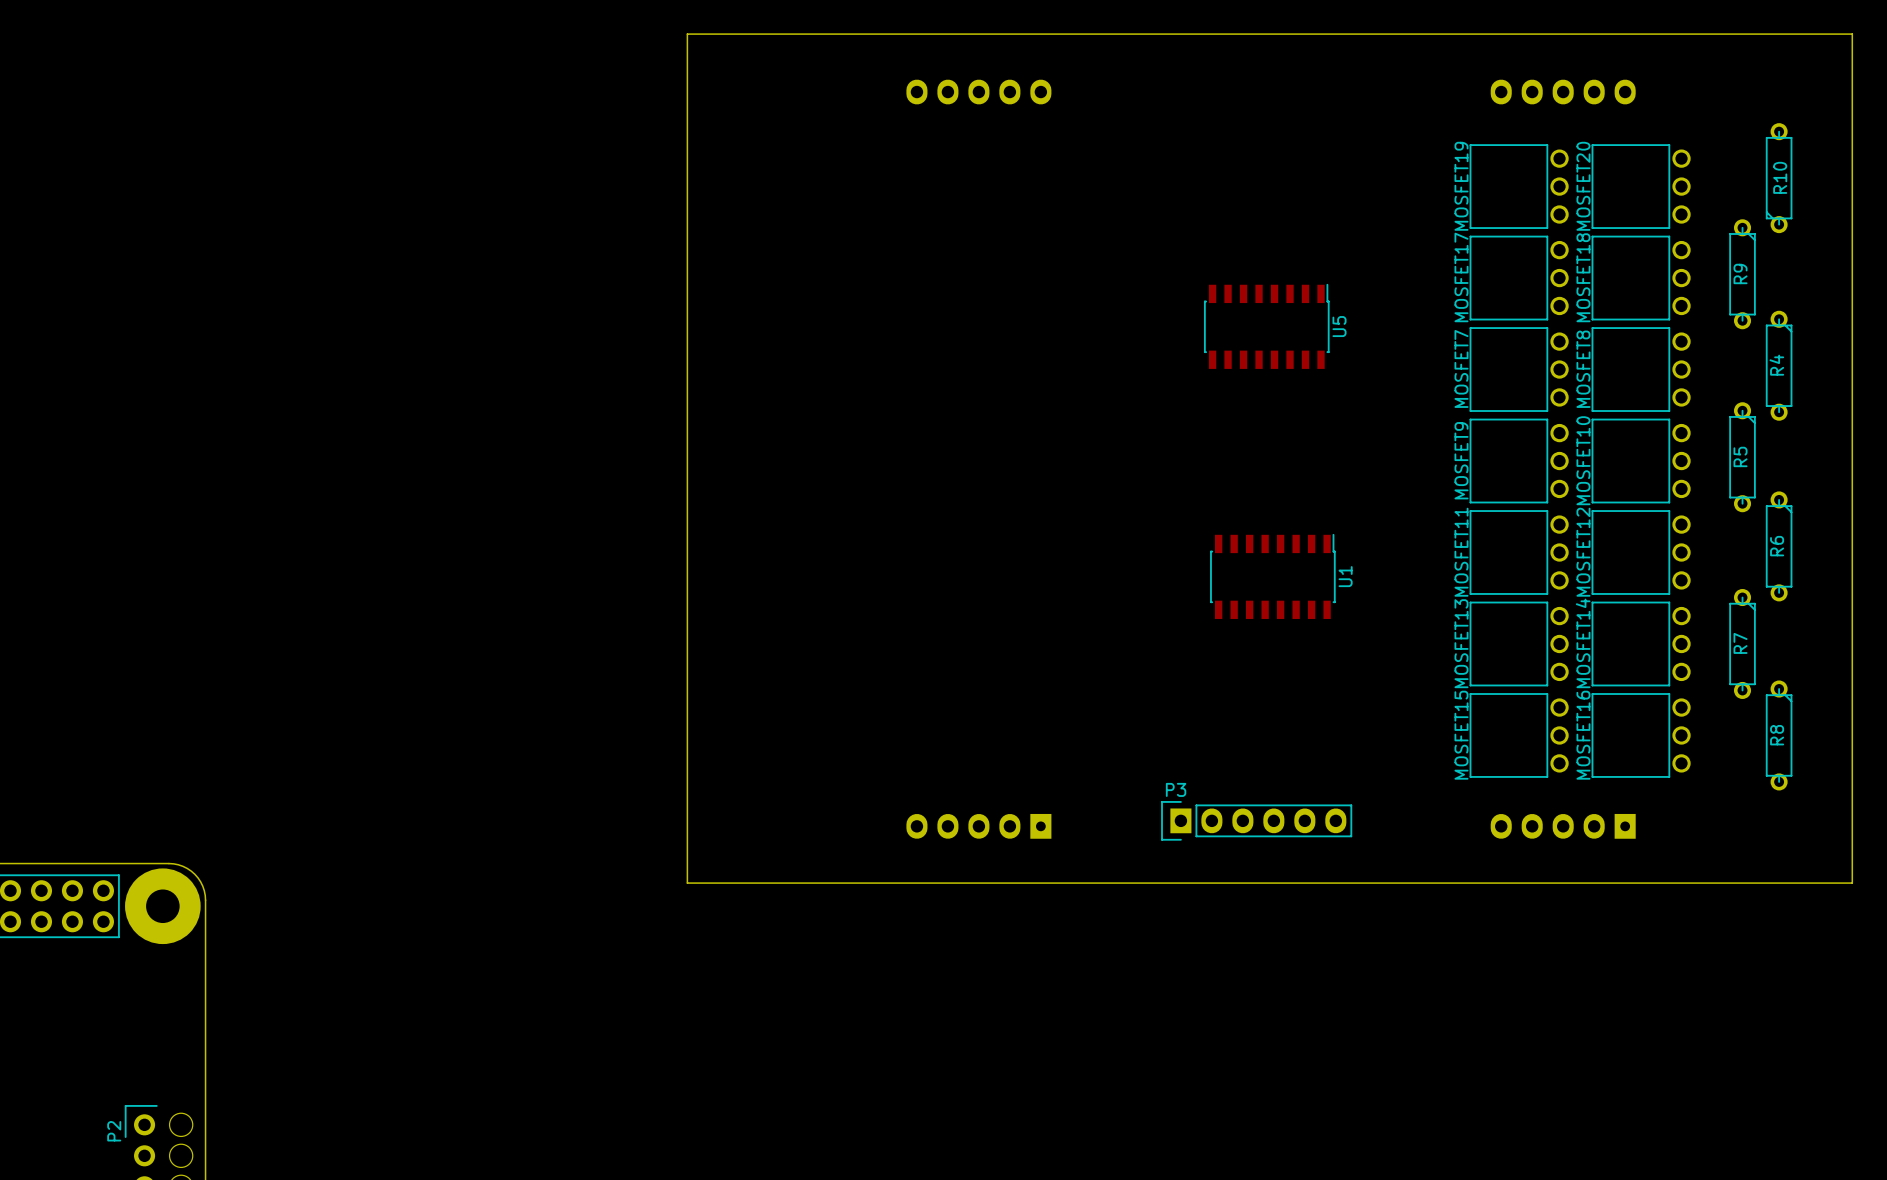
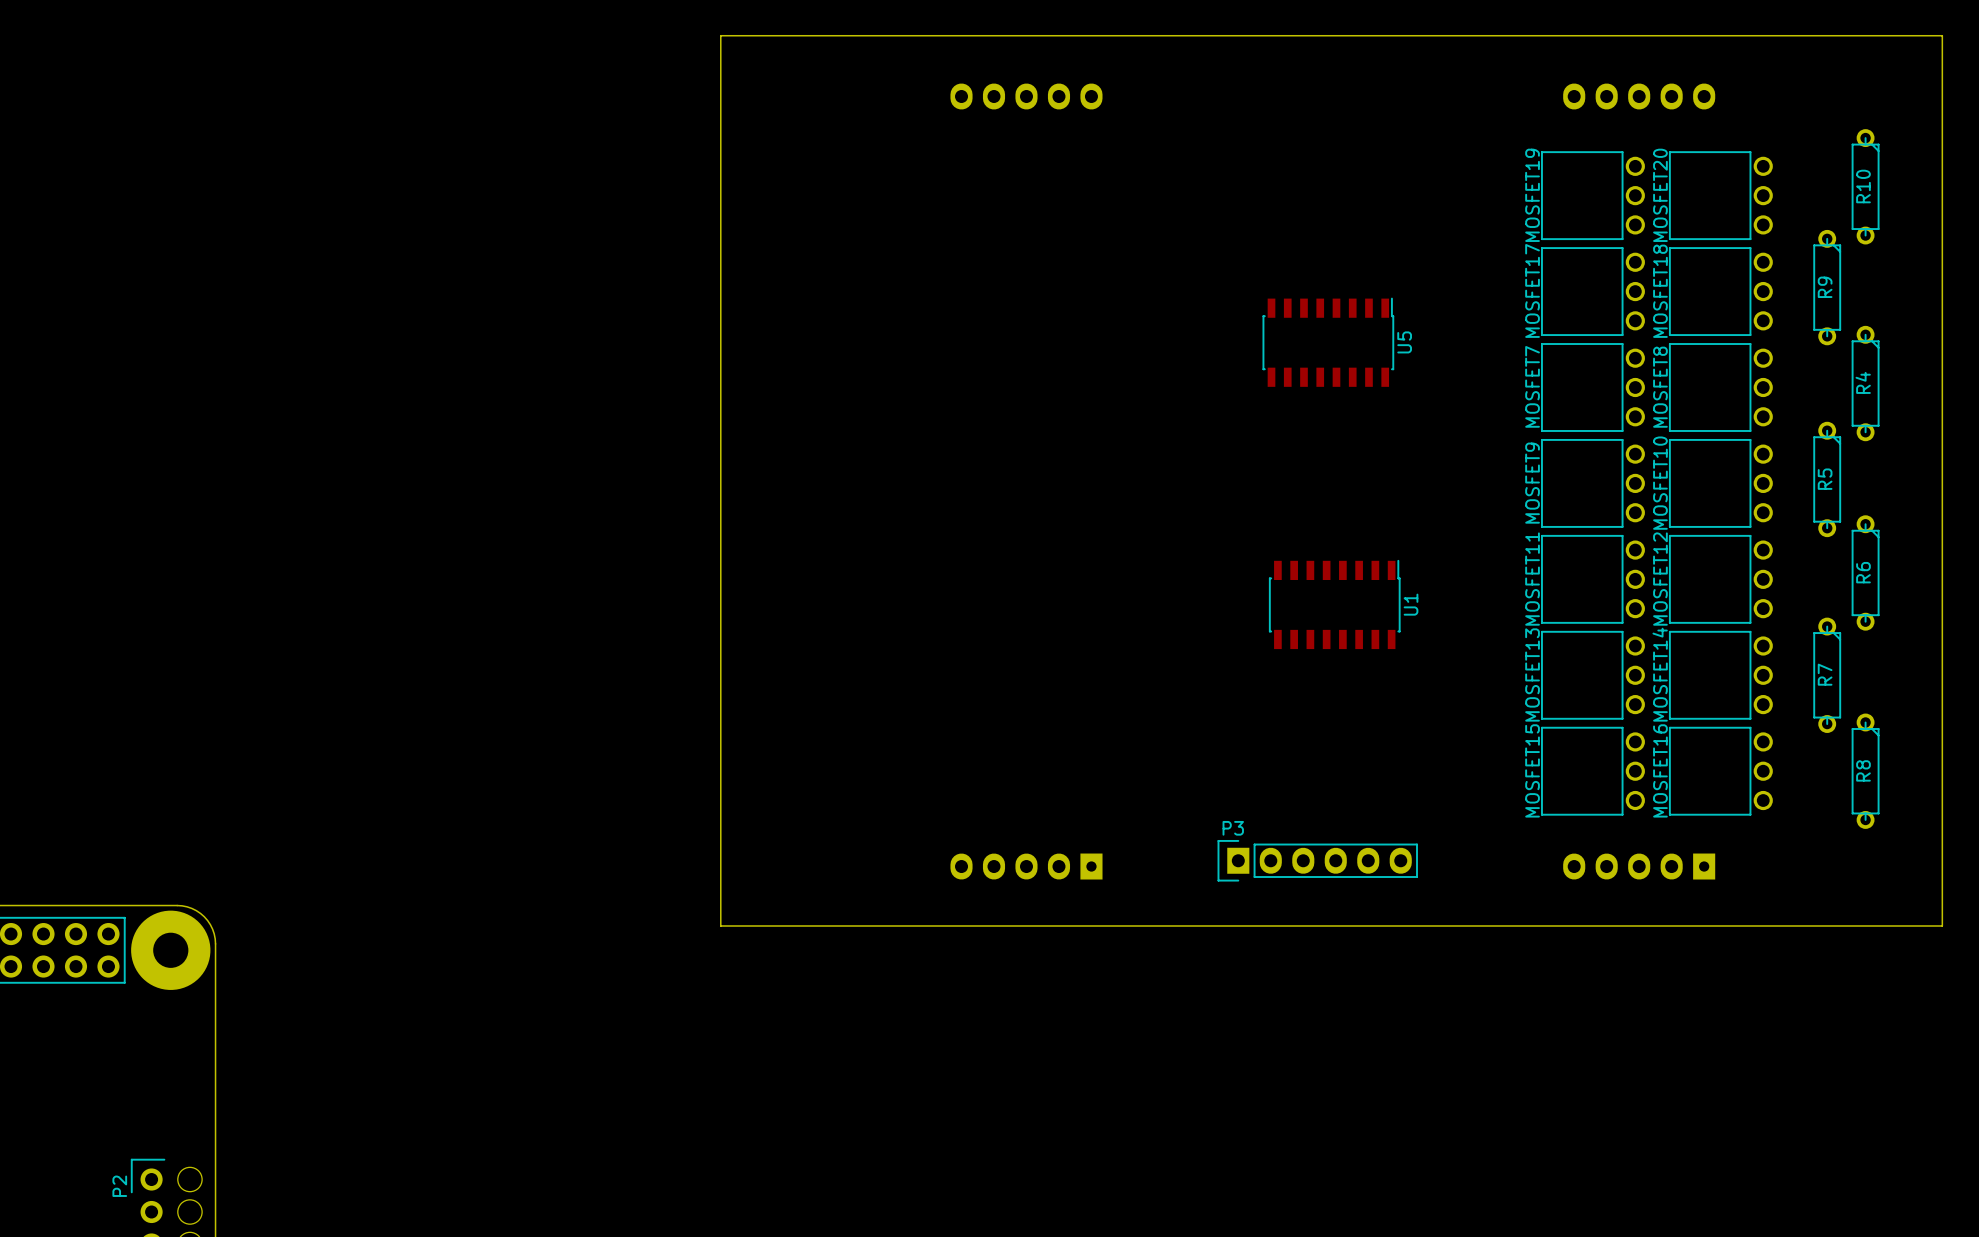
R10 rotation: 0° (1779, 178) -> 180° (1865, 186)

